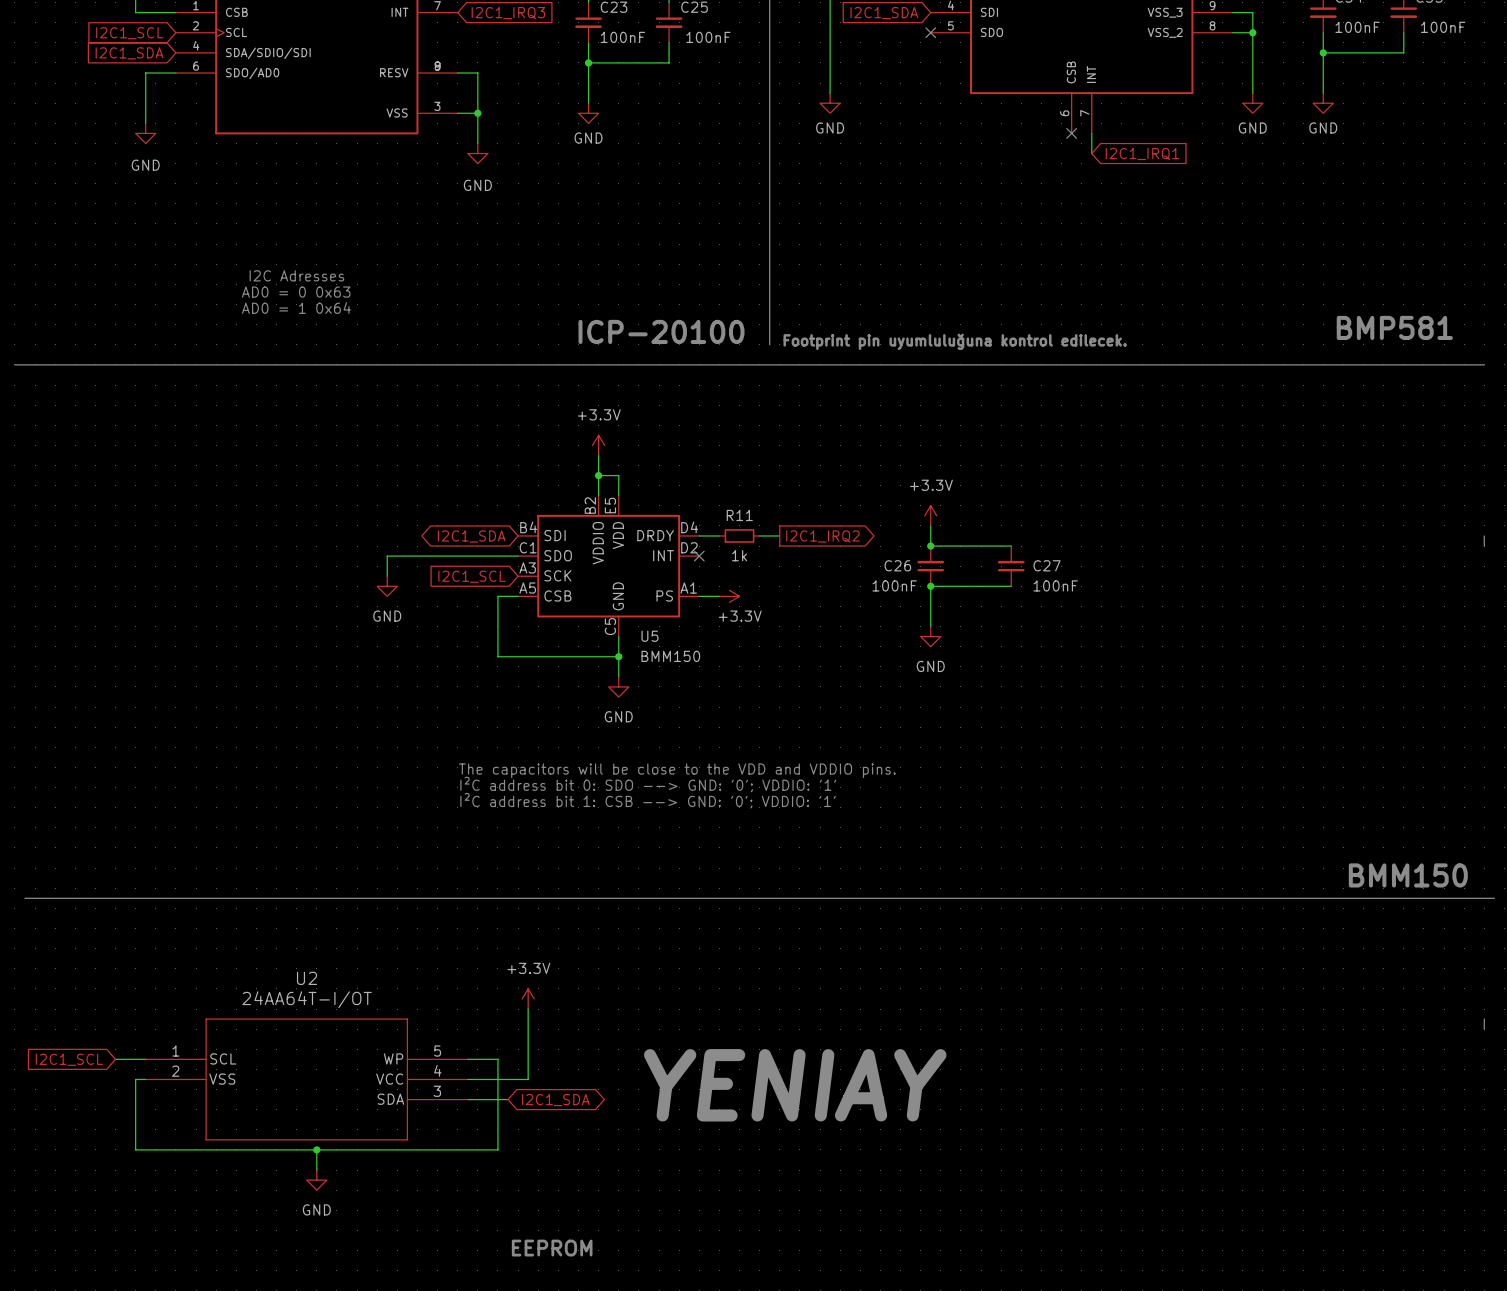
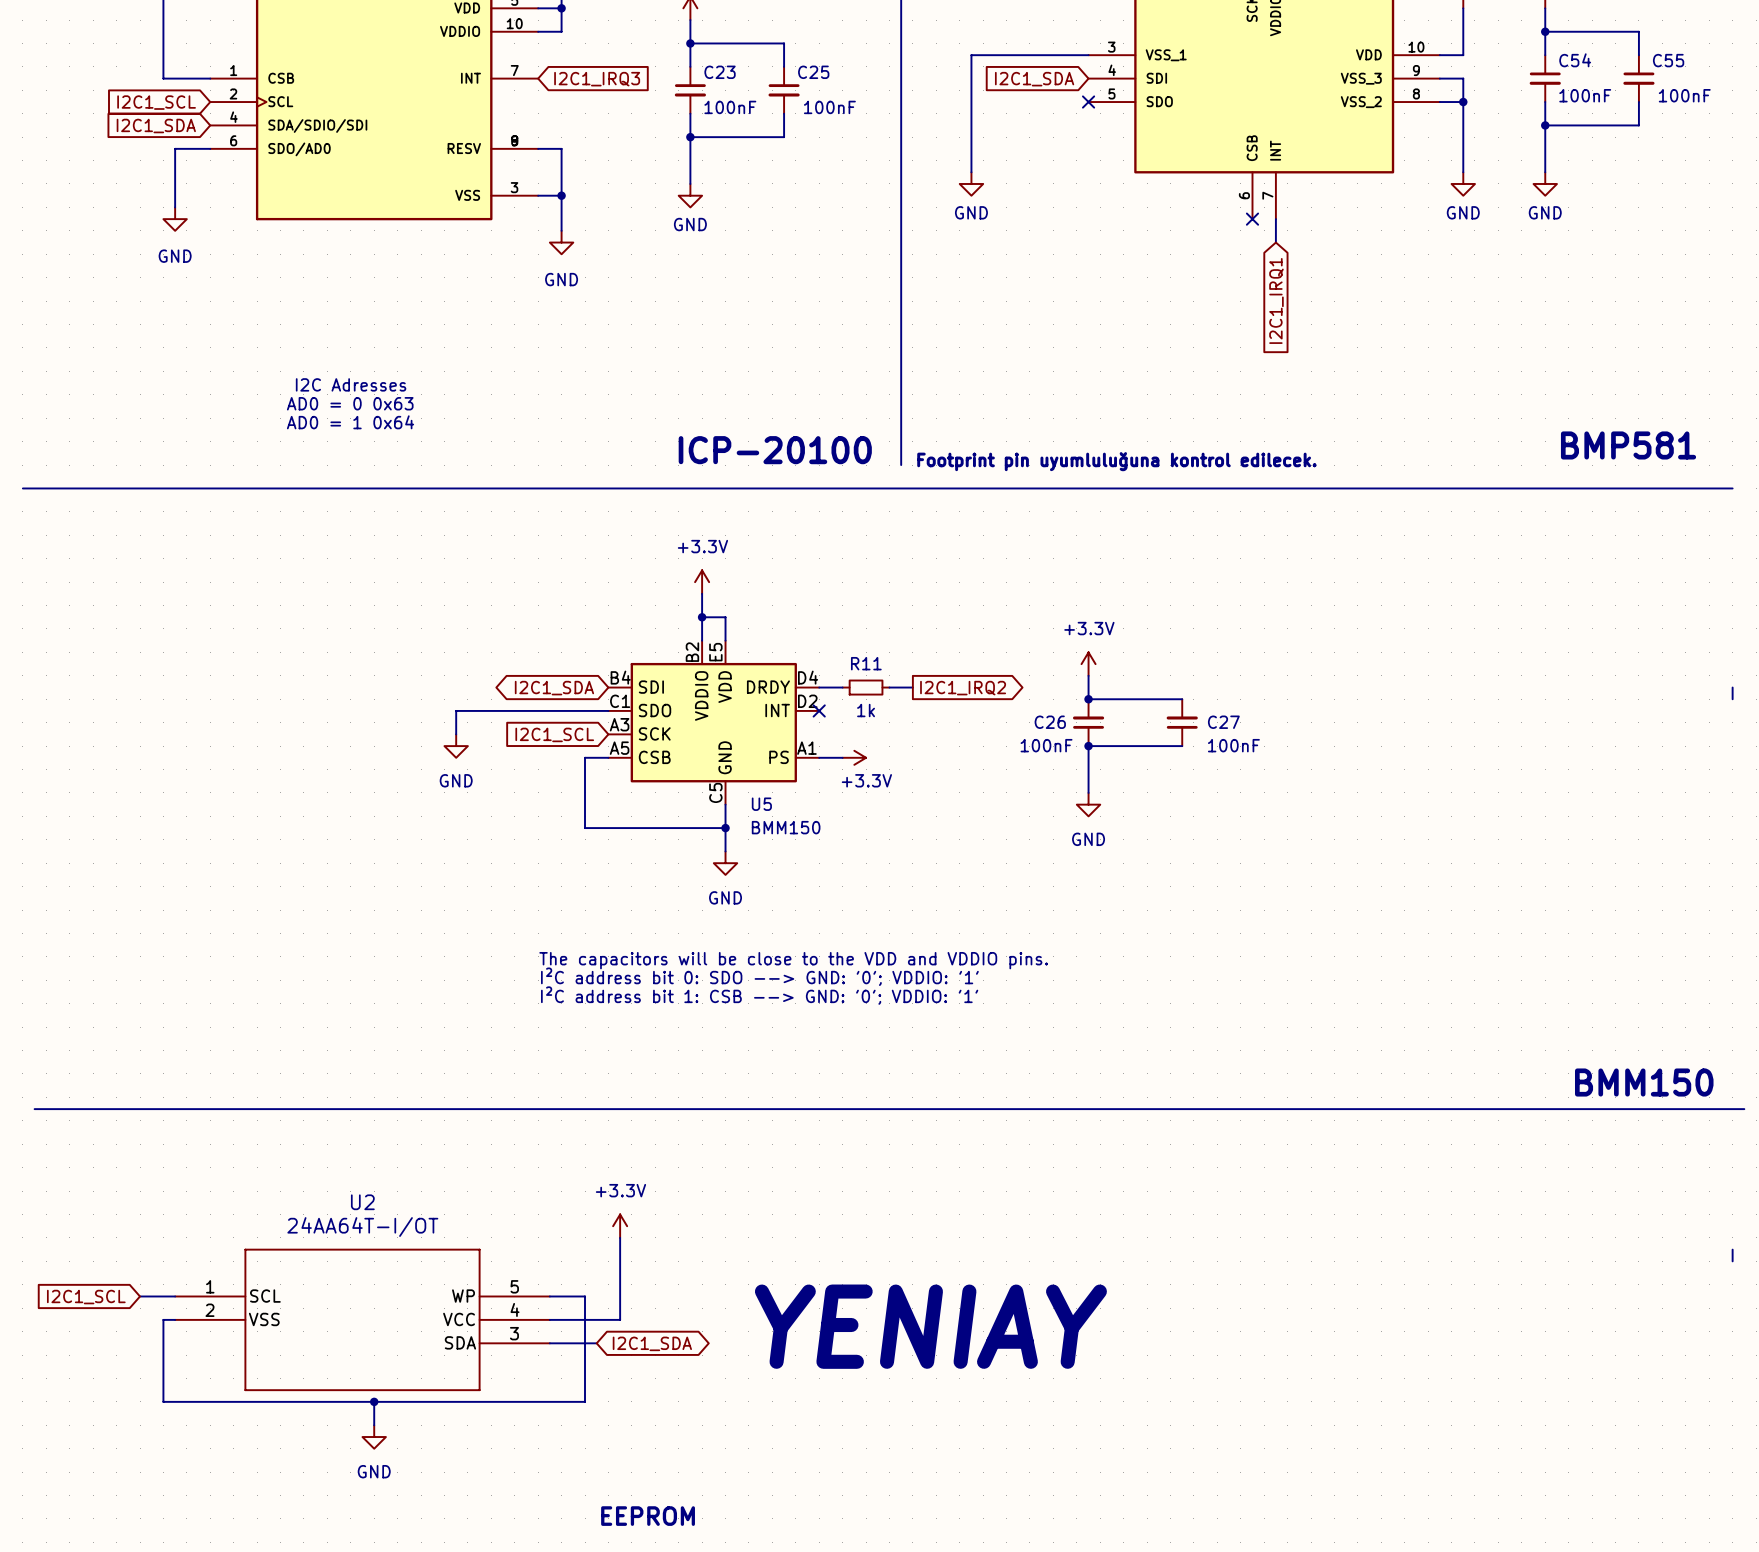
global label rotation: 0° (1142, 154) -> 90° clockwise (1276, 300)

